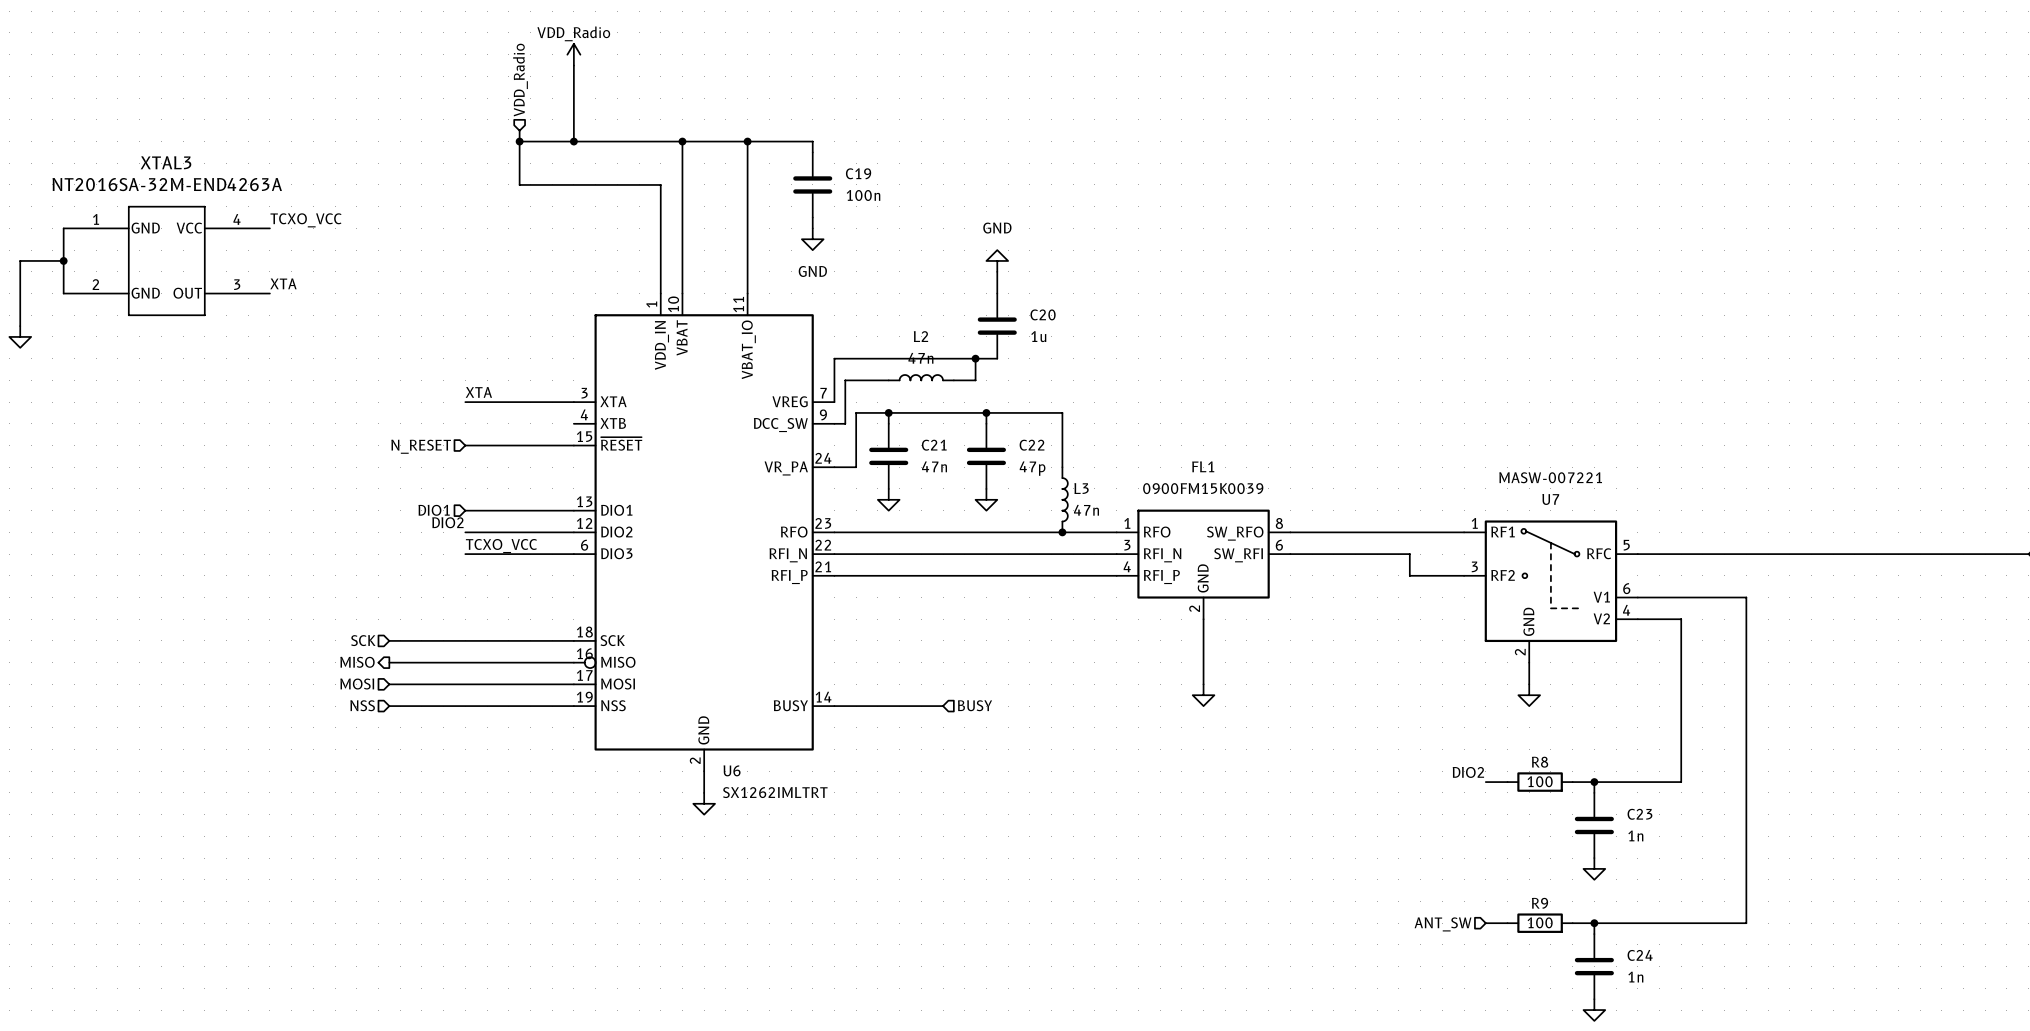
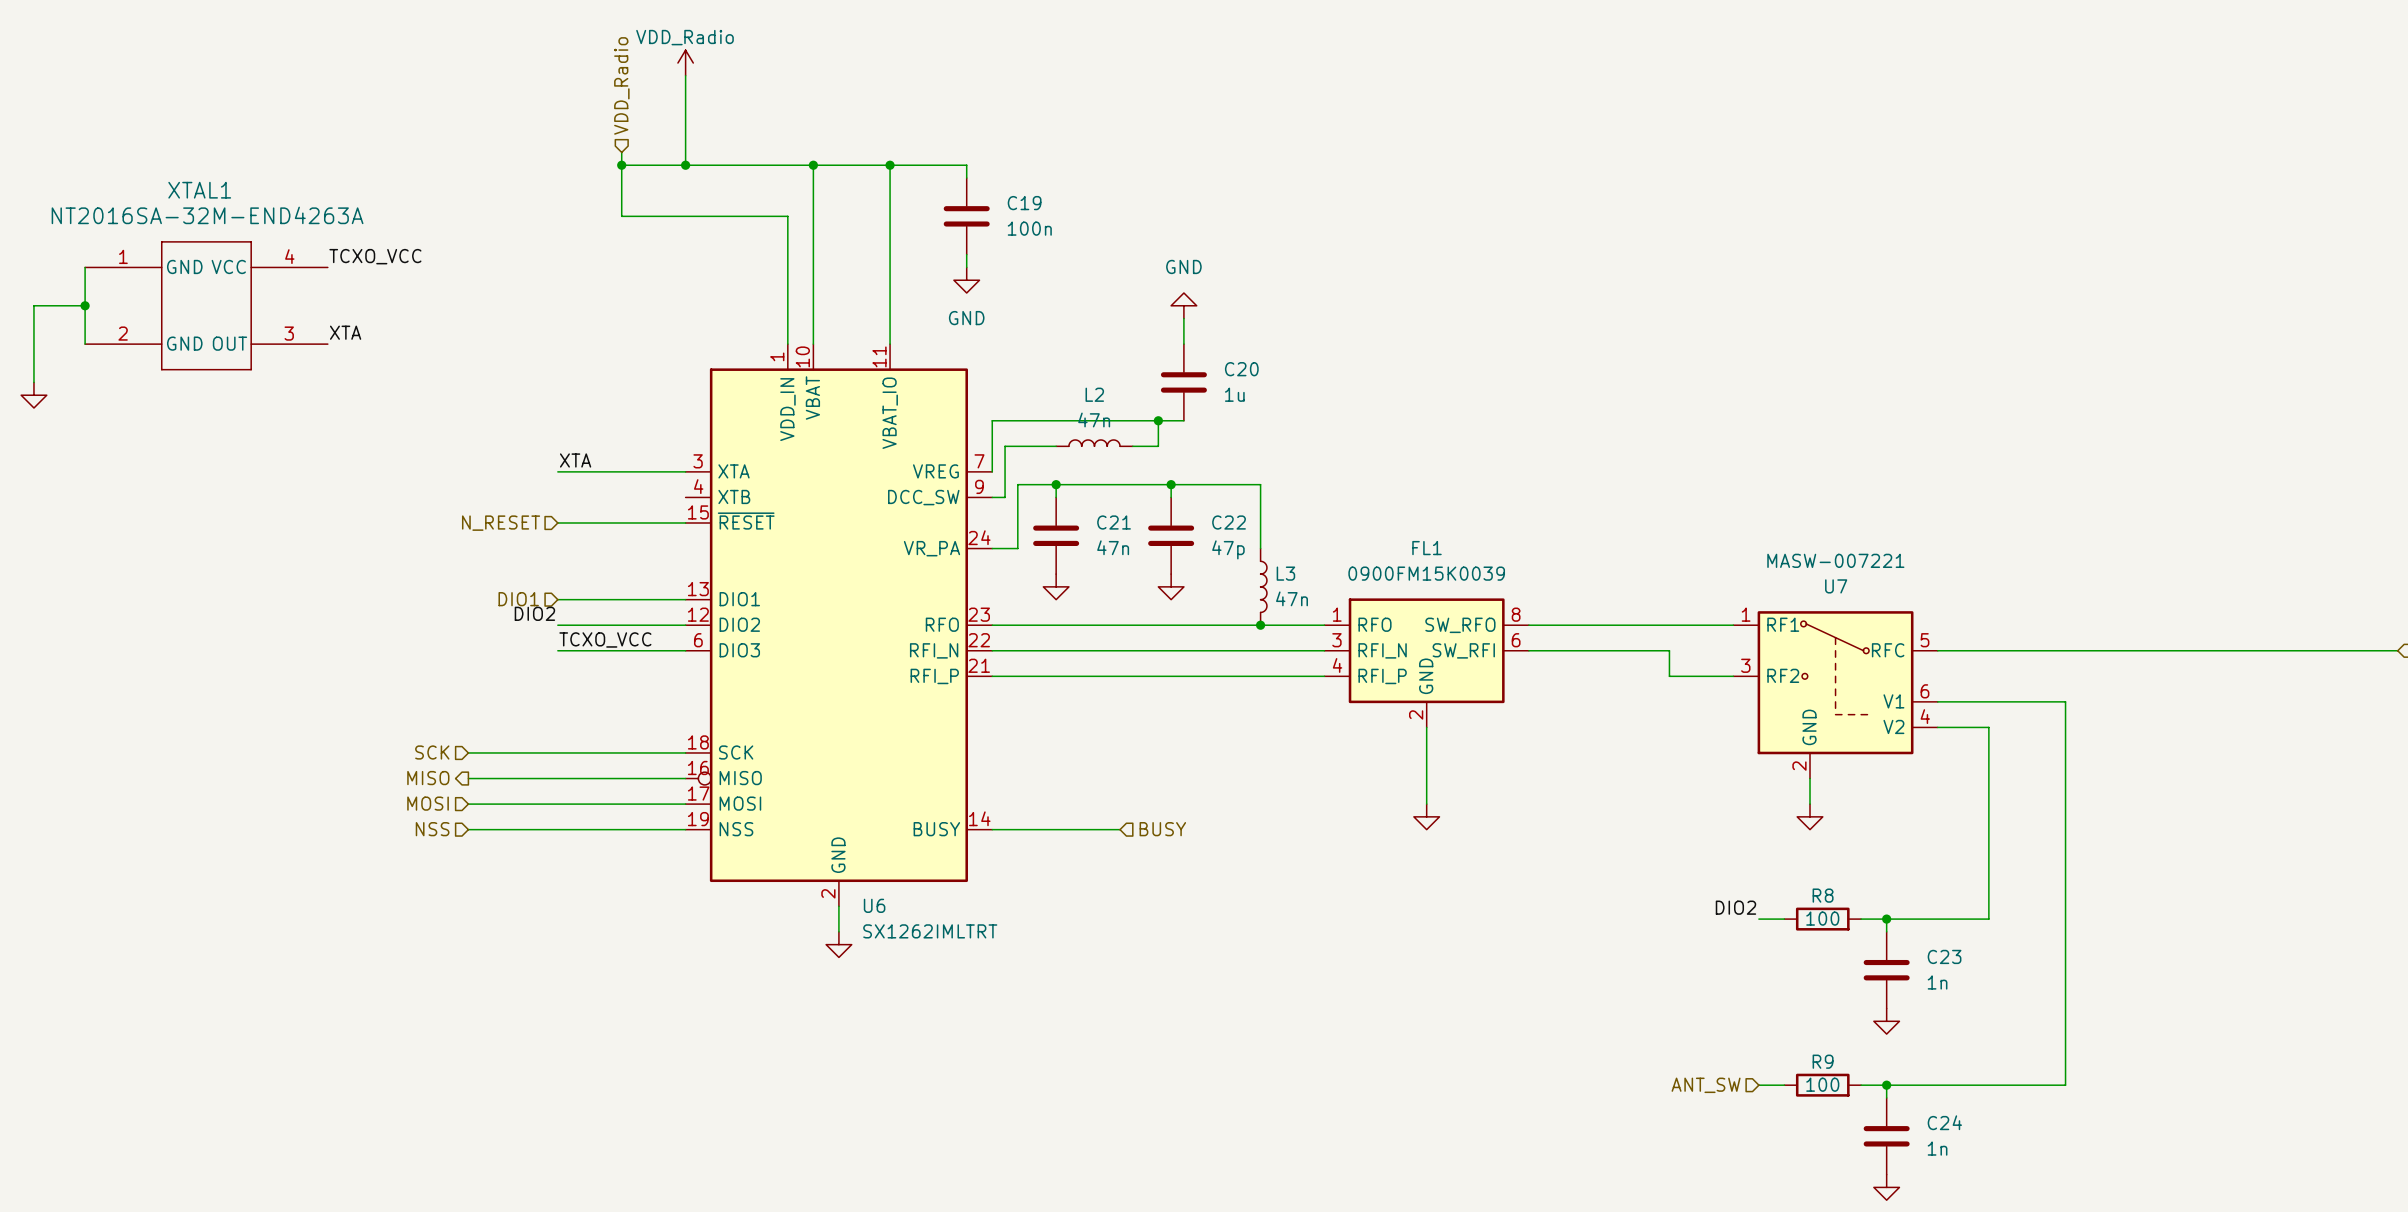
XTAL3 name: XTAL3 (165, 162) -> XTAL1 (199, 190)

